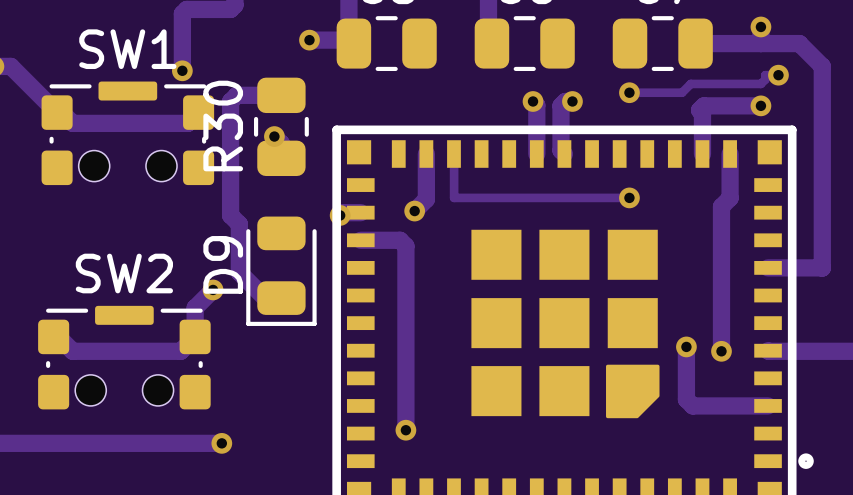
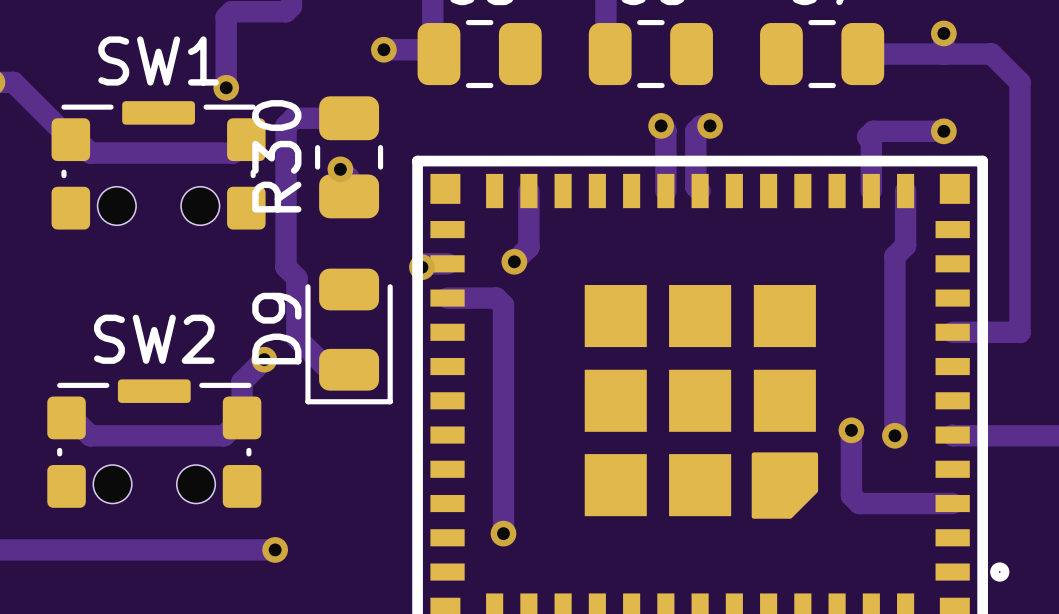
track: (778, 75) (765, 75) (765, 79) (760, 83) (690, 83) (682, 92) (629, 92) -> none
via: (778, 75) -> none
via: (629, 92) -> none
track: (454, 154) (454, 197) (629, 197) -> none
via: (629, 197) -> none

